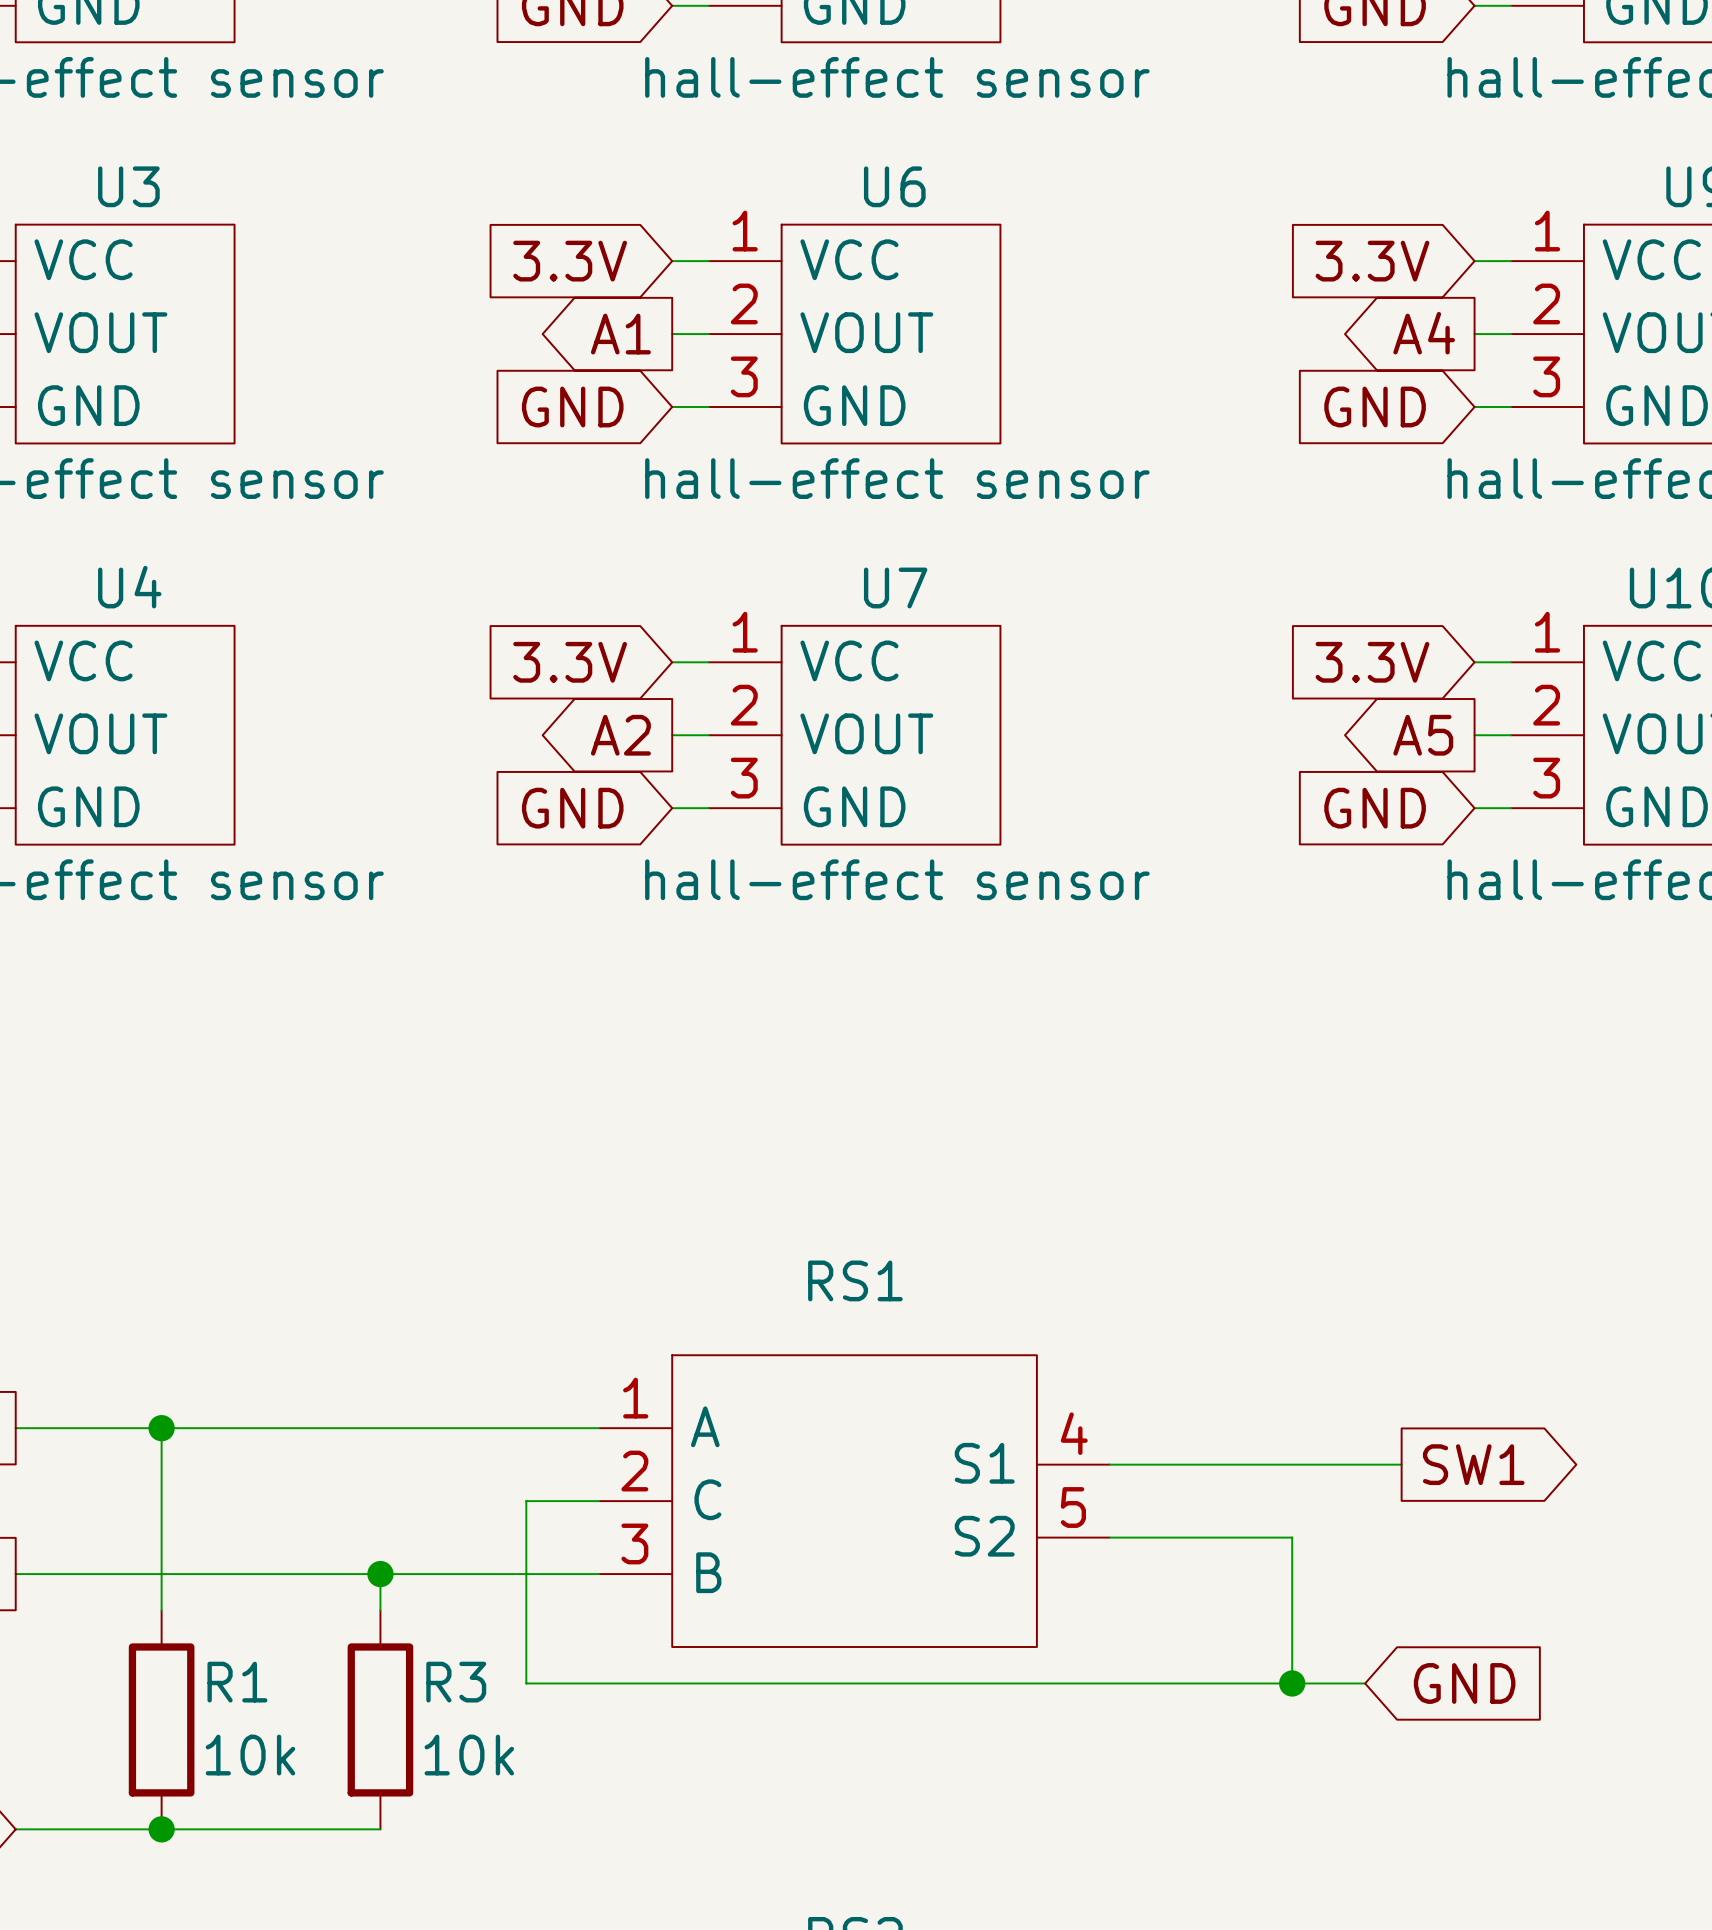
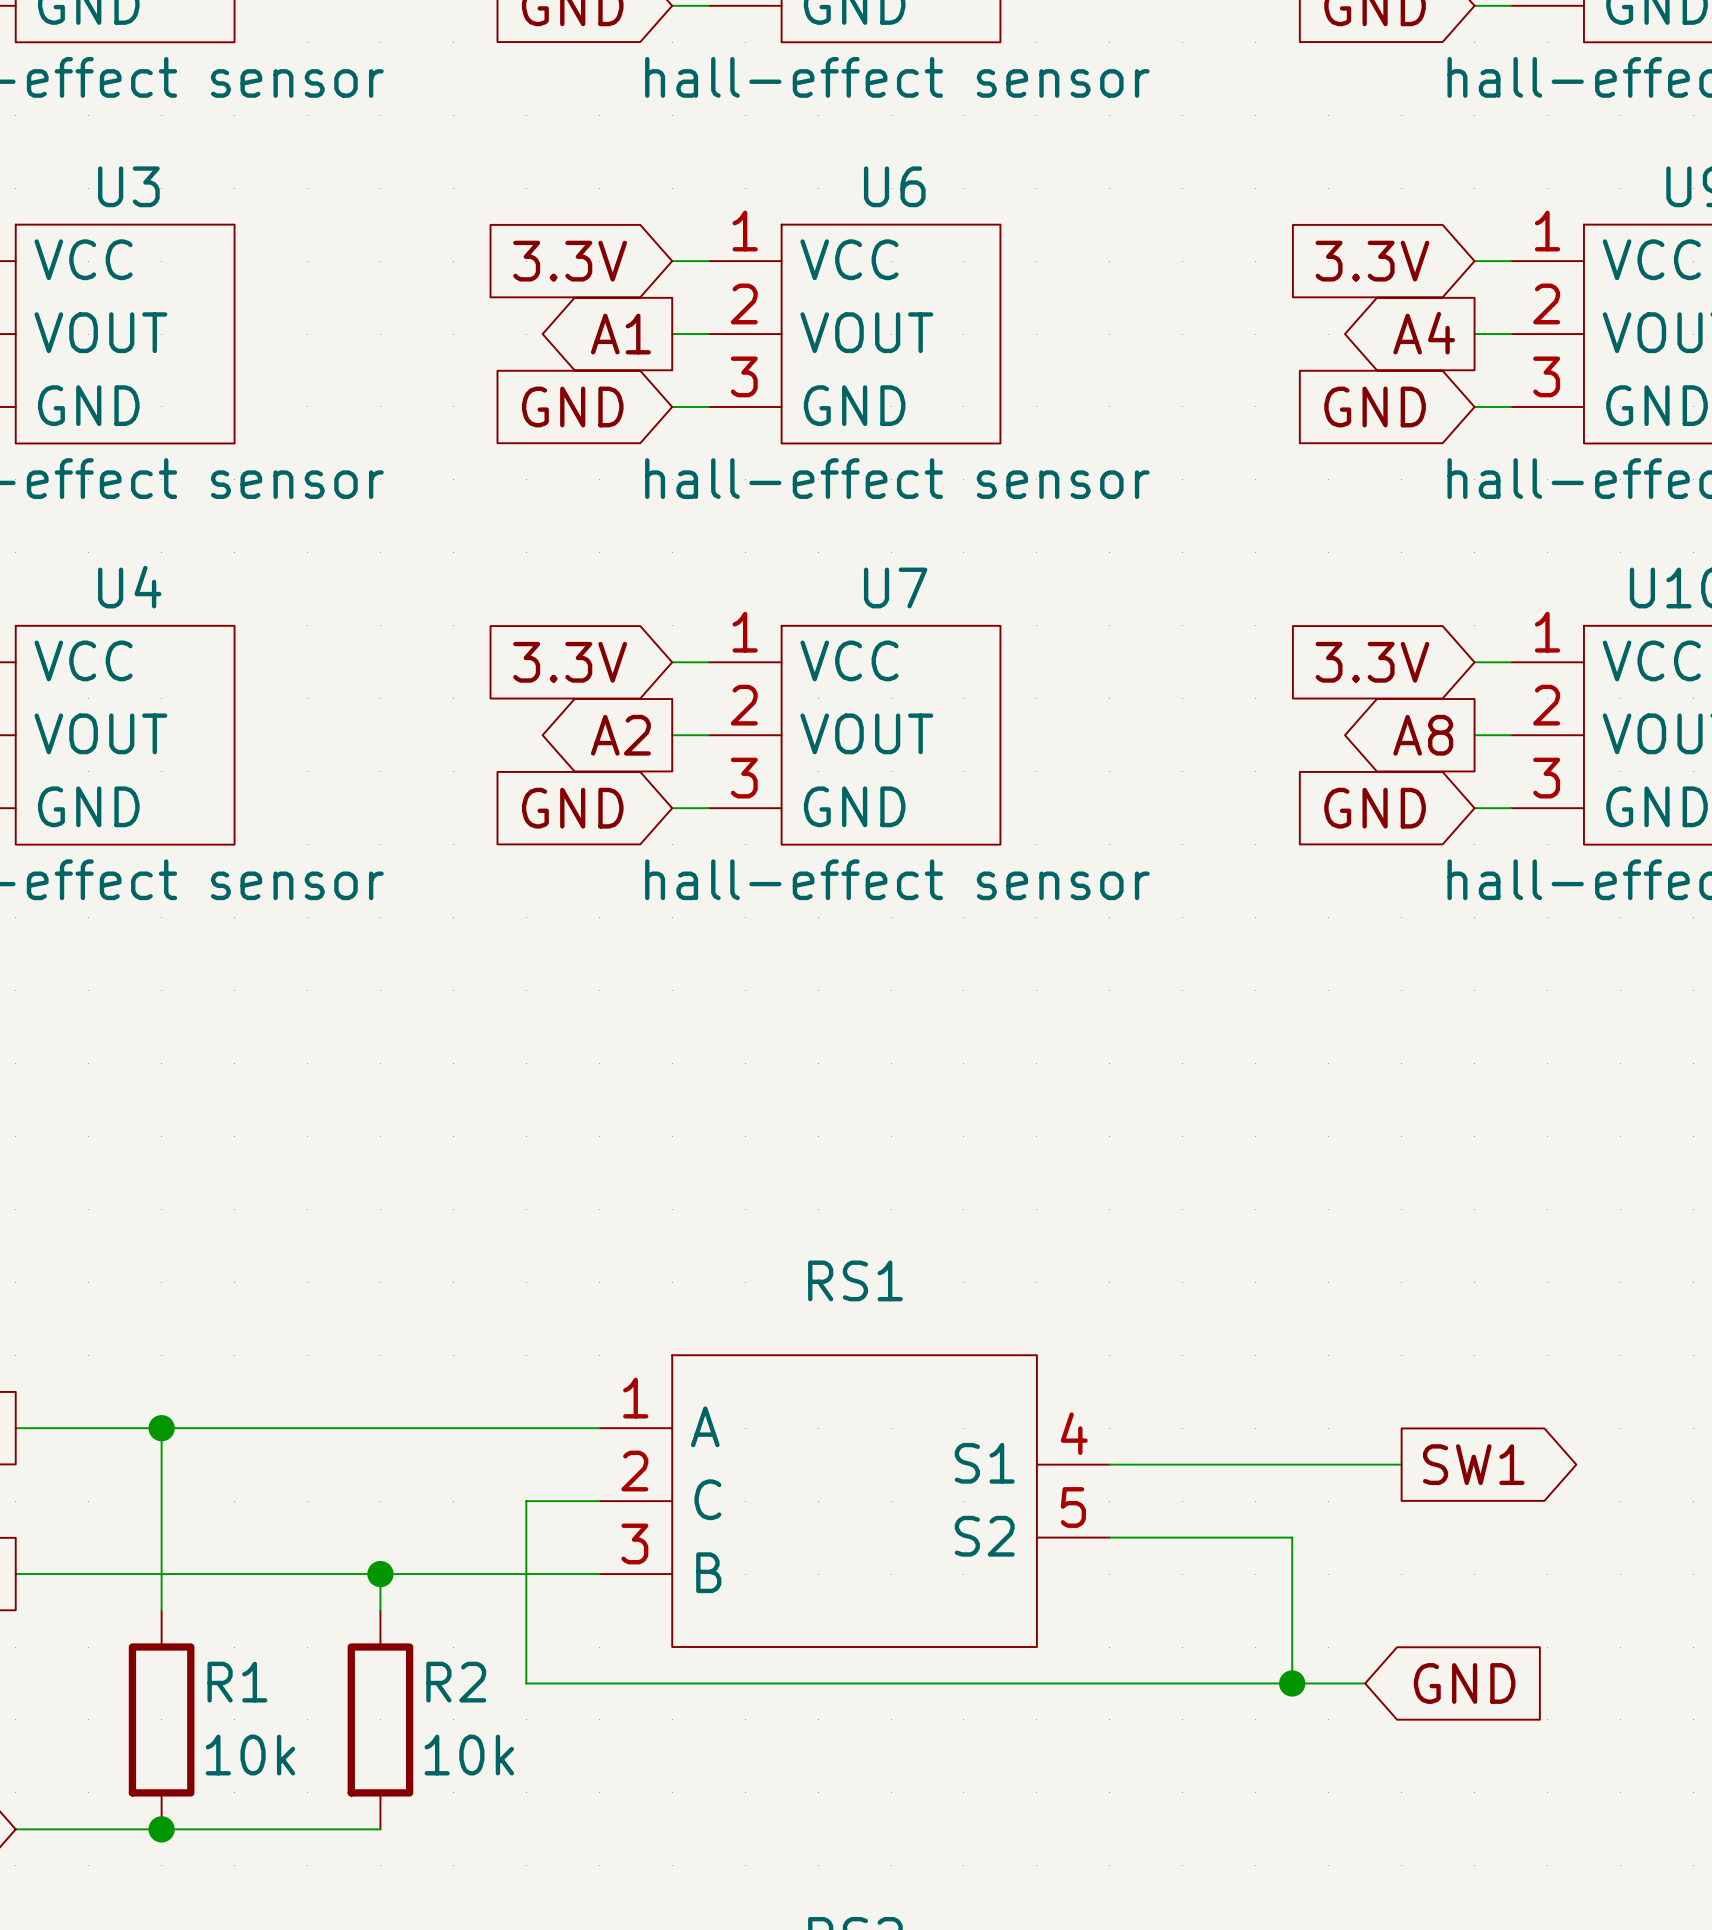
global label: A5 (1423, 735) -> A8 (1423, 735)
R3 name: R3 (456, 1682) -> R2 (456, 1682)

